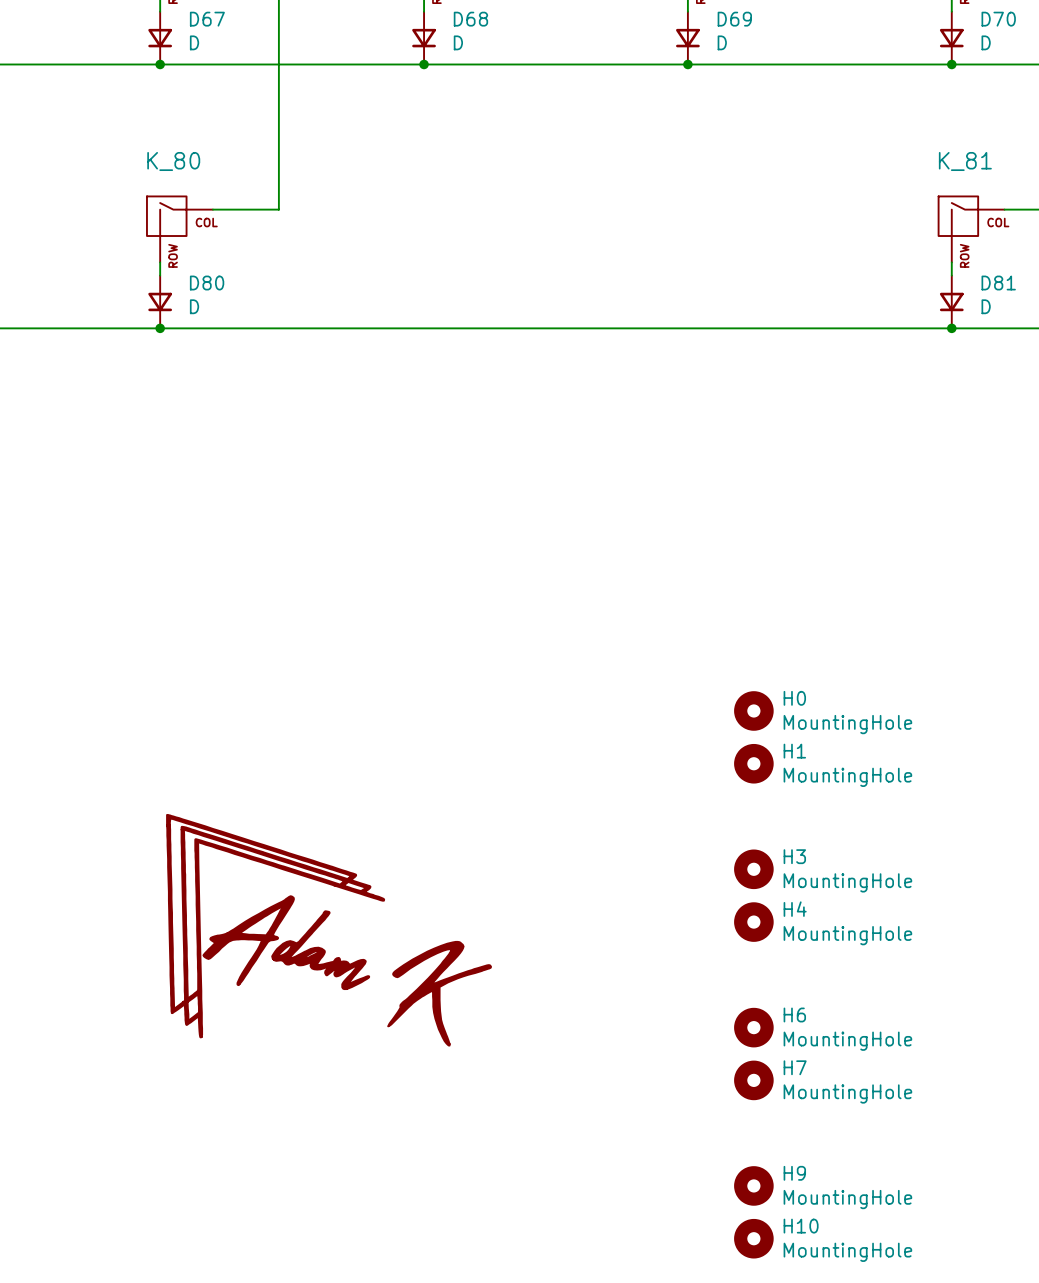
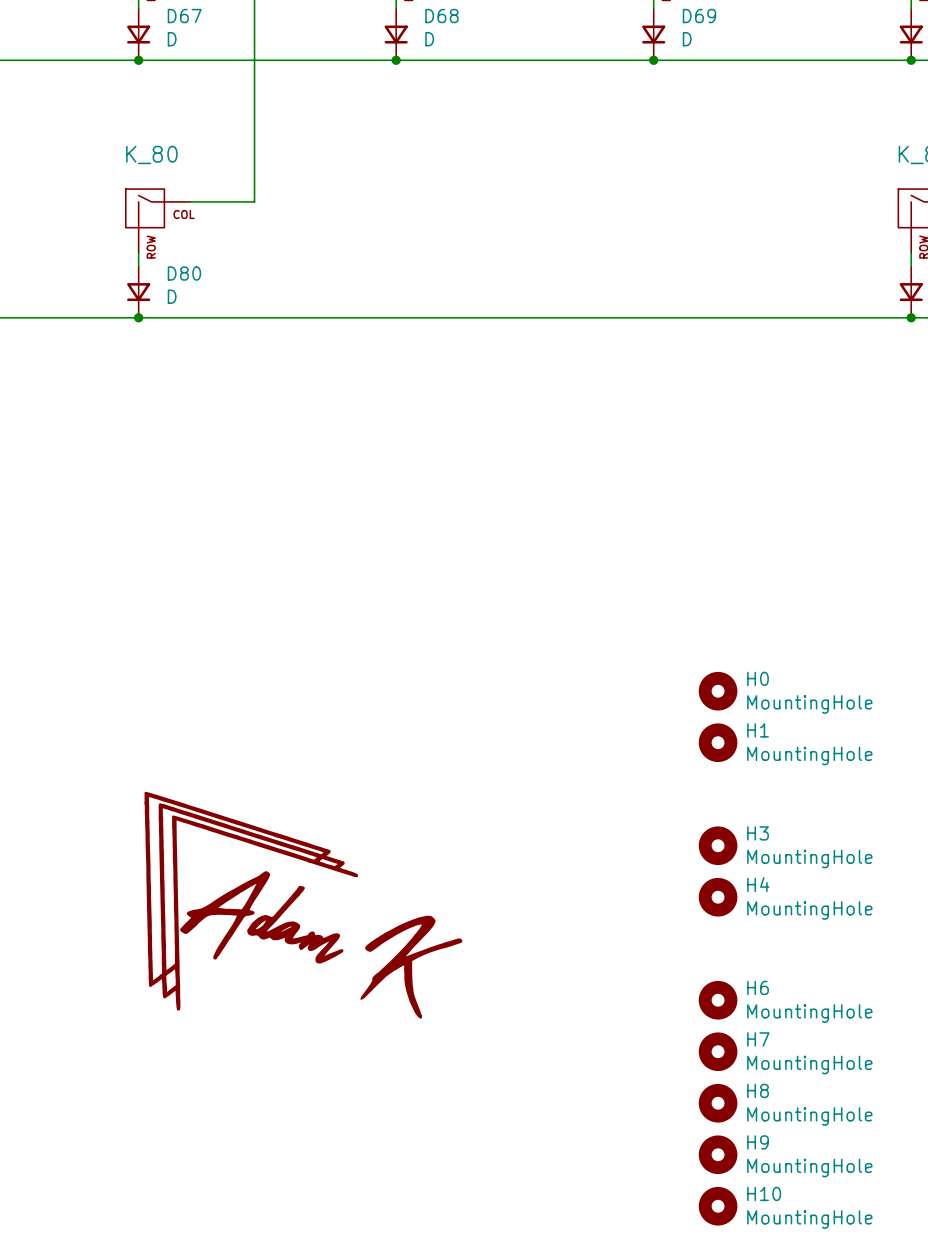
H8: none -> MountingHole (718, 1103)

